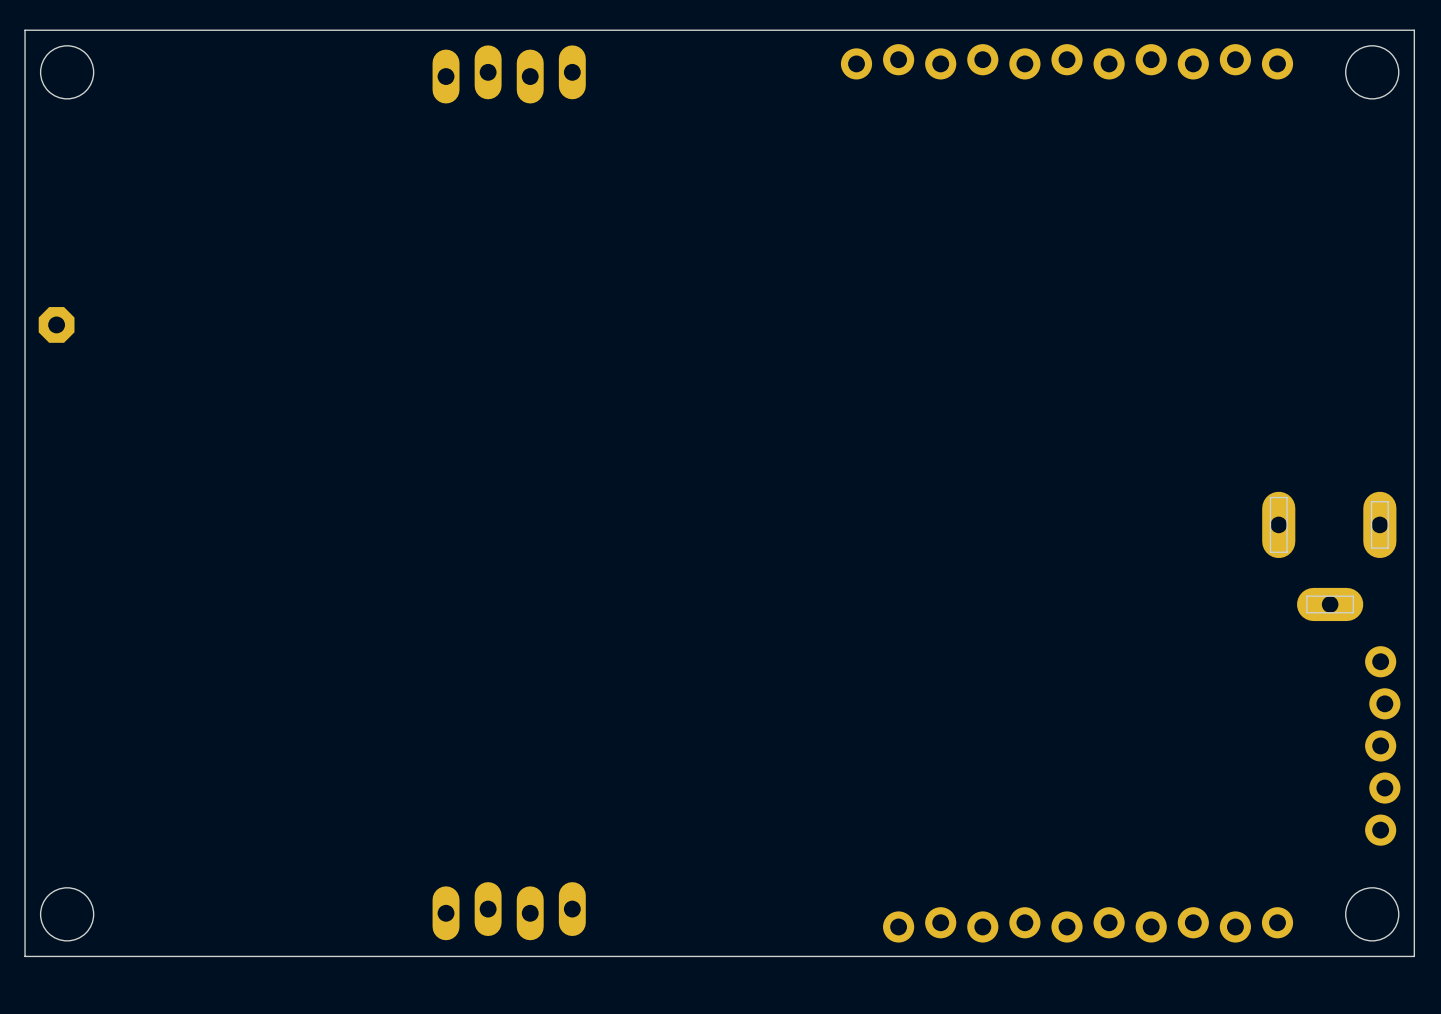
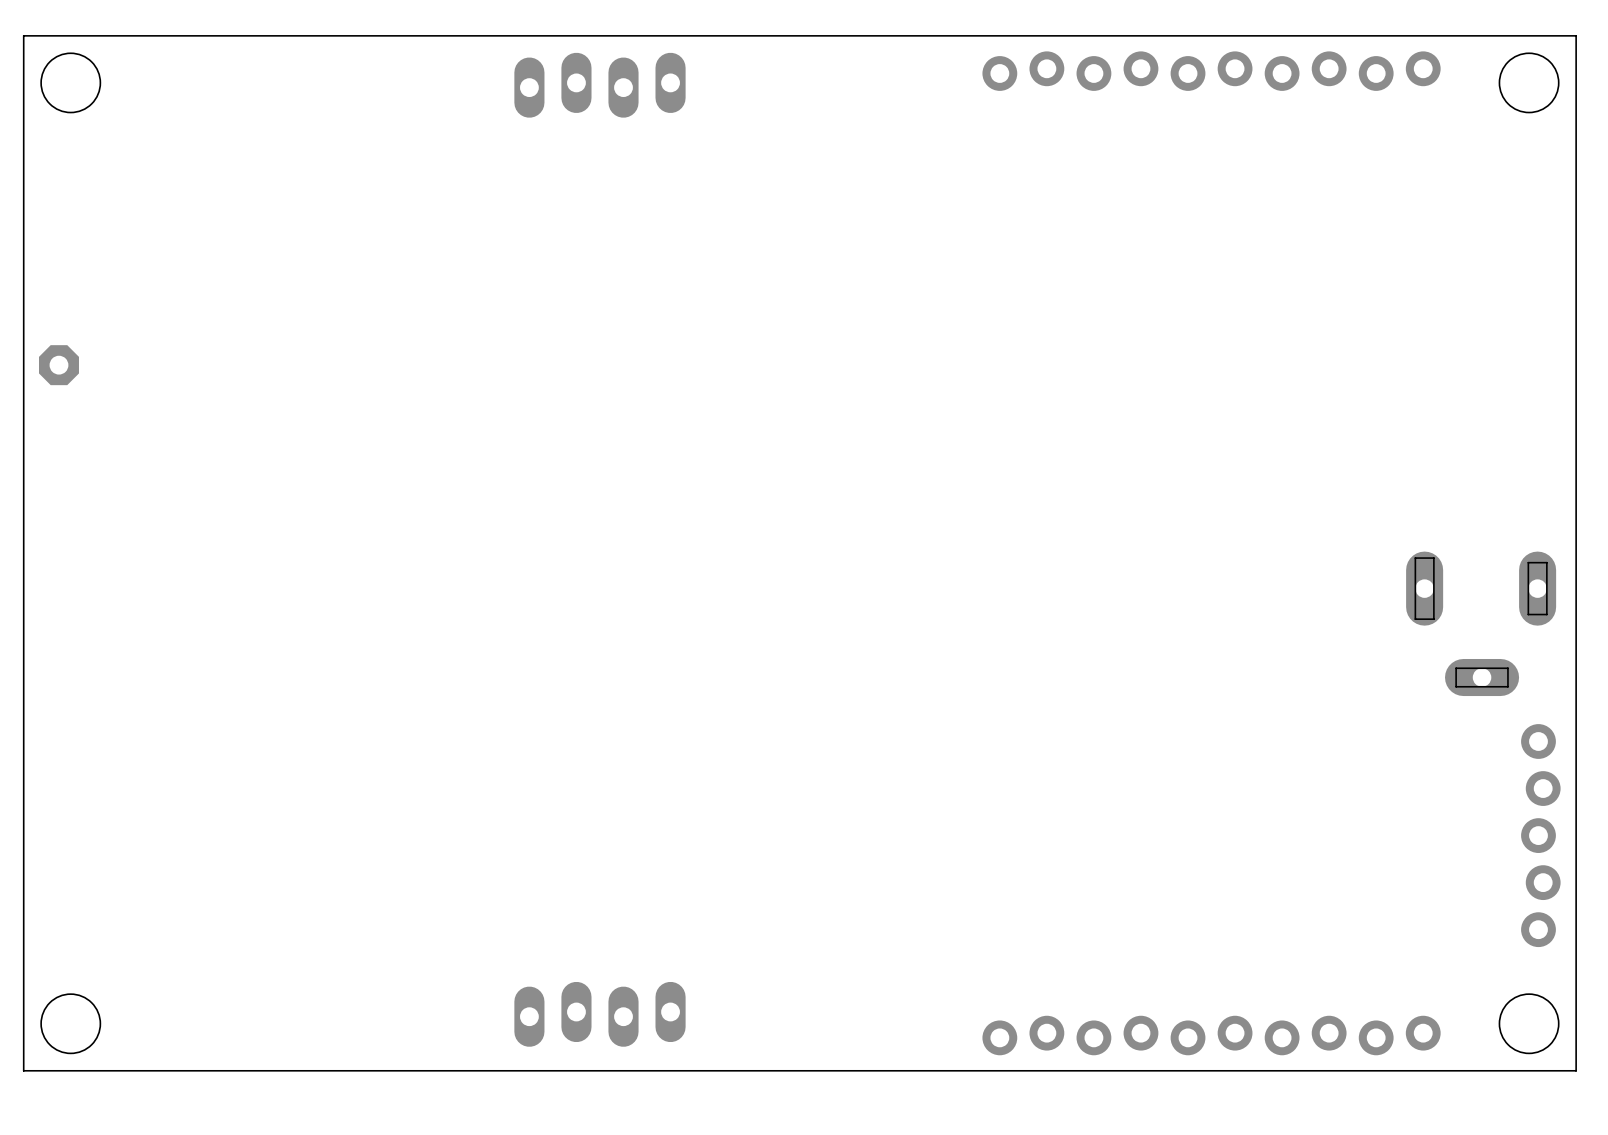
part: (1067, 61) -> none
part: none -> (1211, 71)
part position: (509, 74) -> (599, 85)
part position: (509, 911) -> (599, 1014)

